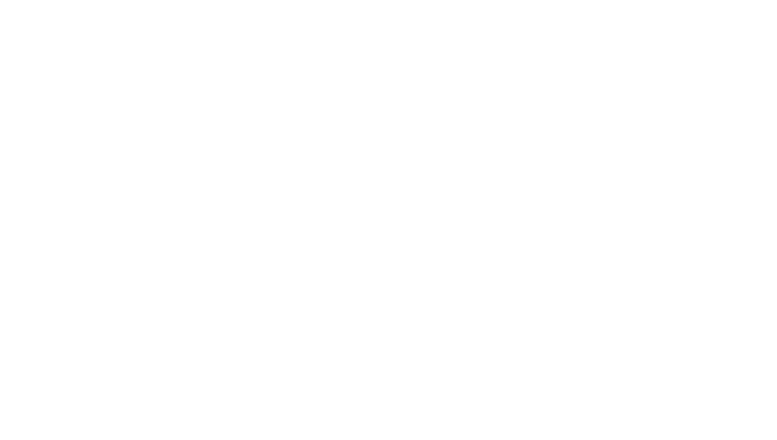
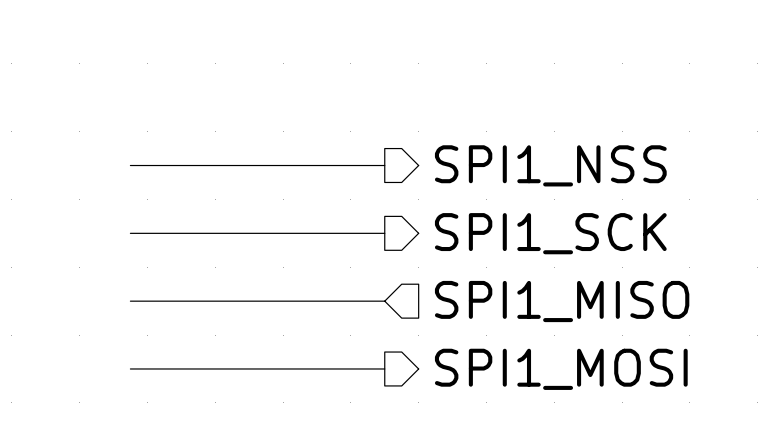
wire: none -> (130, 165) (384, 165)
hierarchical label: none -> SPI1_NSS (550, 165)
wire: none -> (130, 233) (384, 233)
hierarchical label: none -> SPI1_SCK (550, 233)
wire: none -> (130, 301) (384, 301)
hierarchical label: none -> SPI1_MISO (562, 301)
wire: none -> (130, 368) (384, 368)
hierarchical label: none -> SPI1_MOSI (561, 369)

